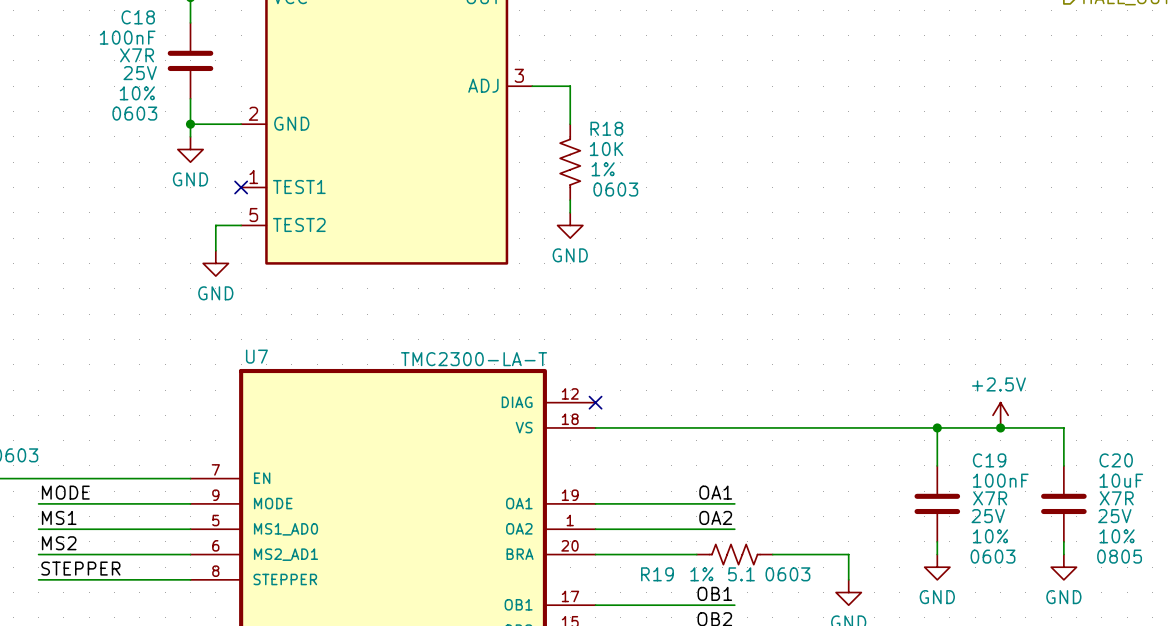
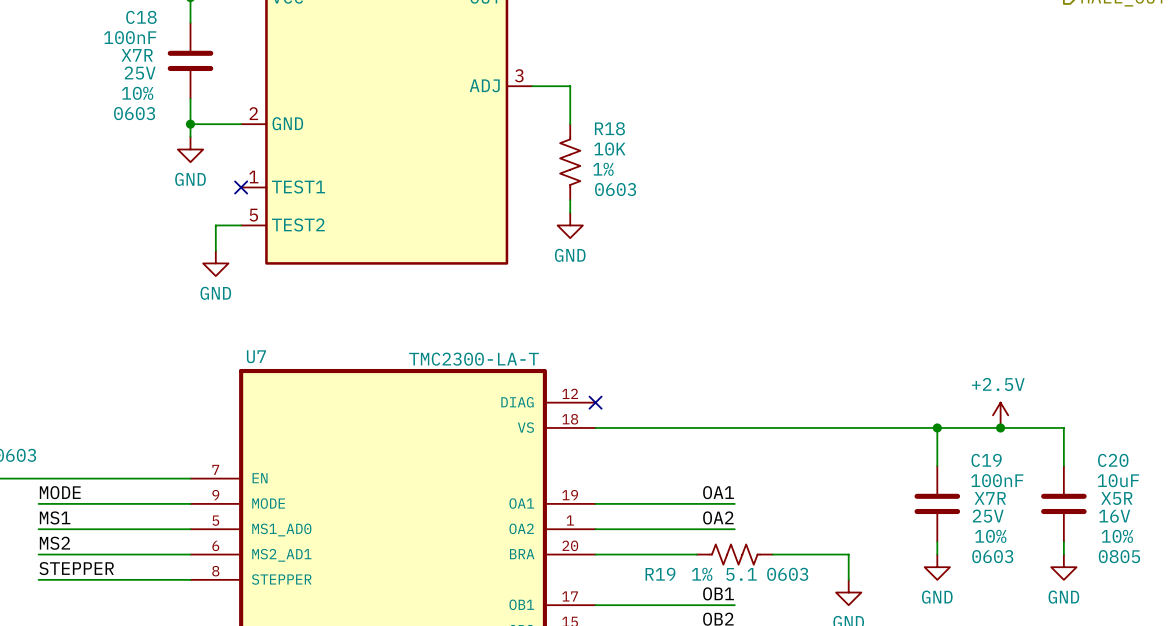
C20 text: X7R (1116, 498) -> X5R (1116, 498)
C20 text: 25V (1114, 516) -> 16V (1114, 516)

